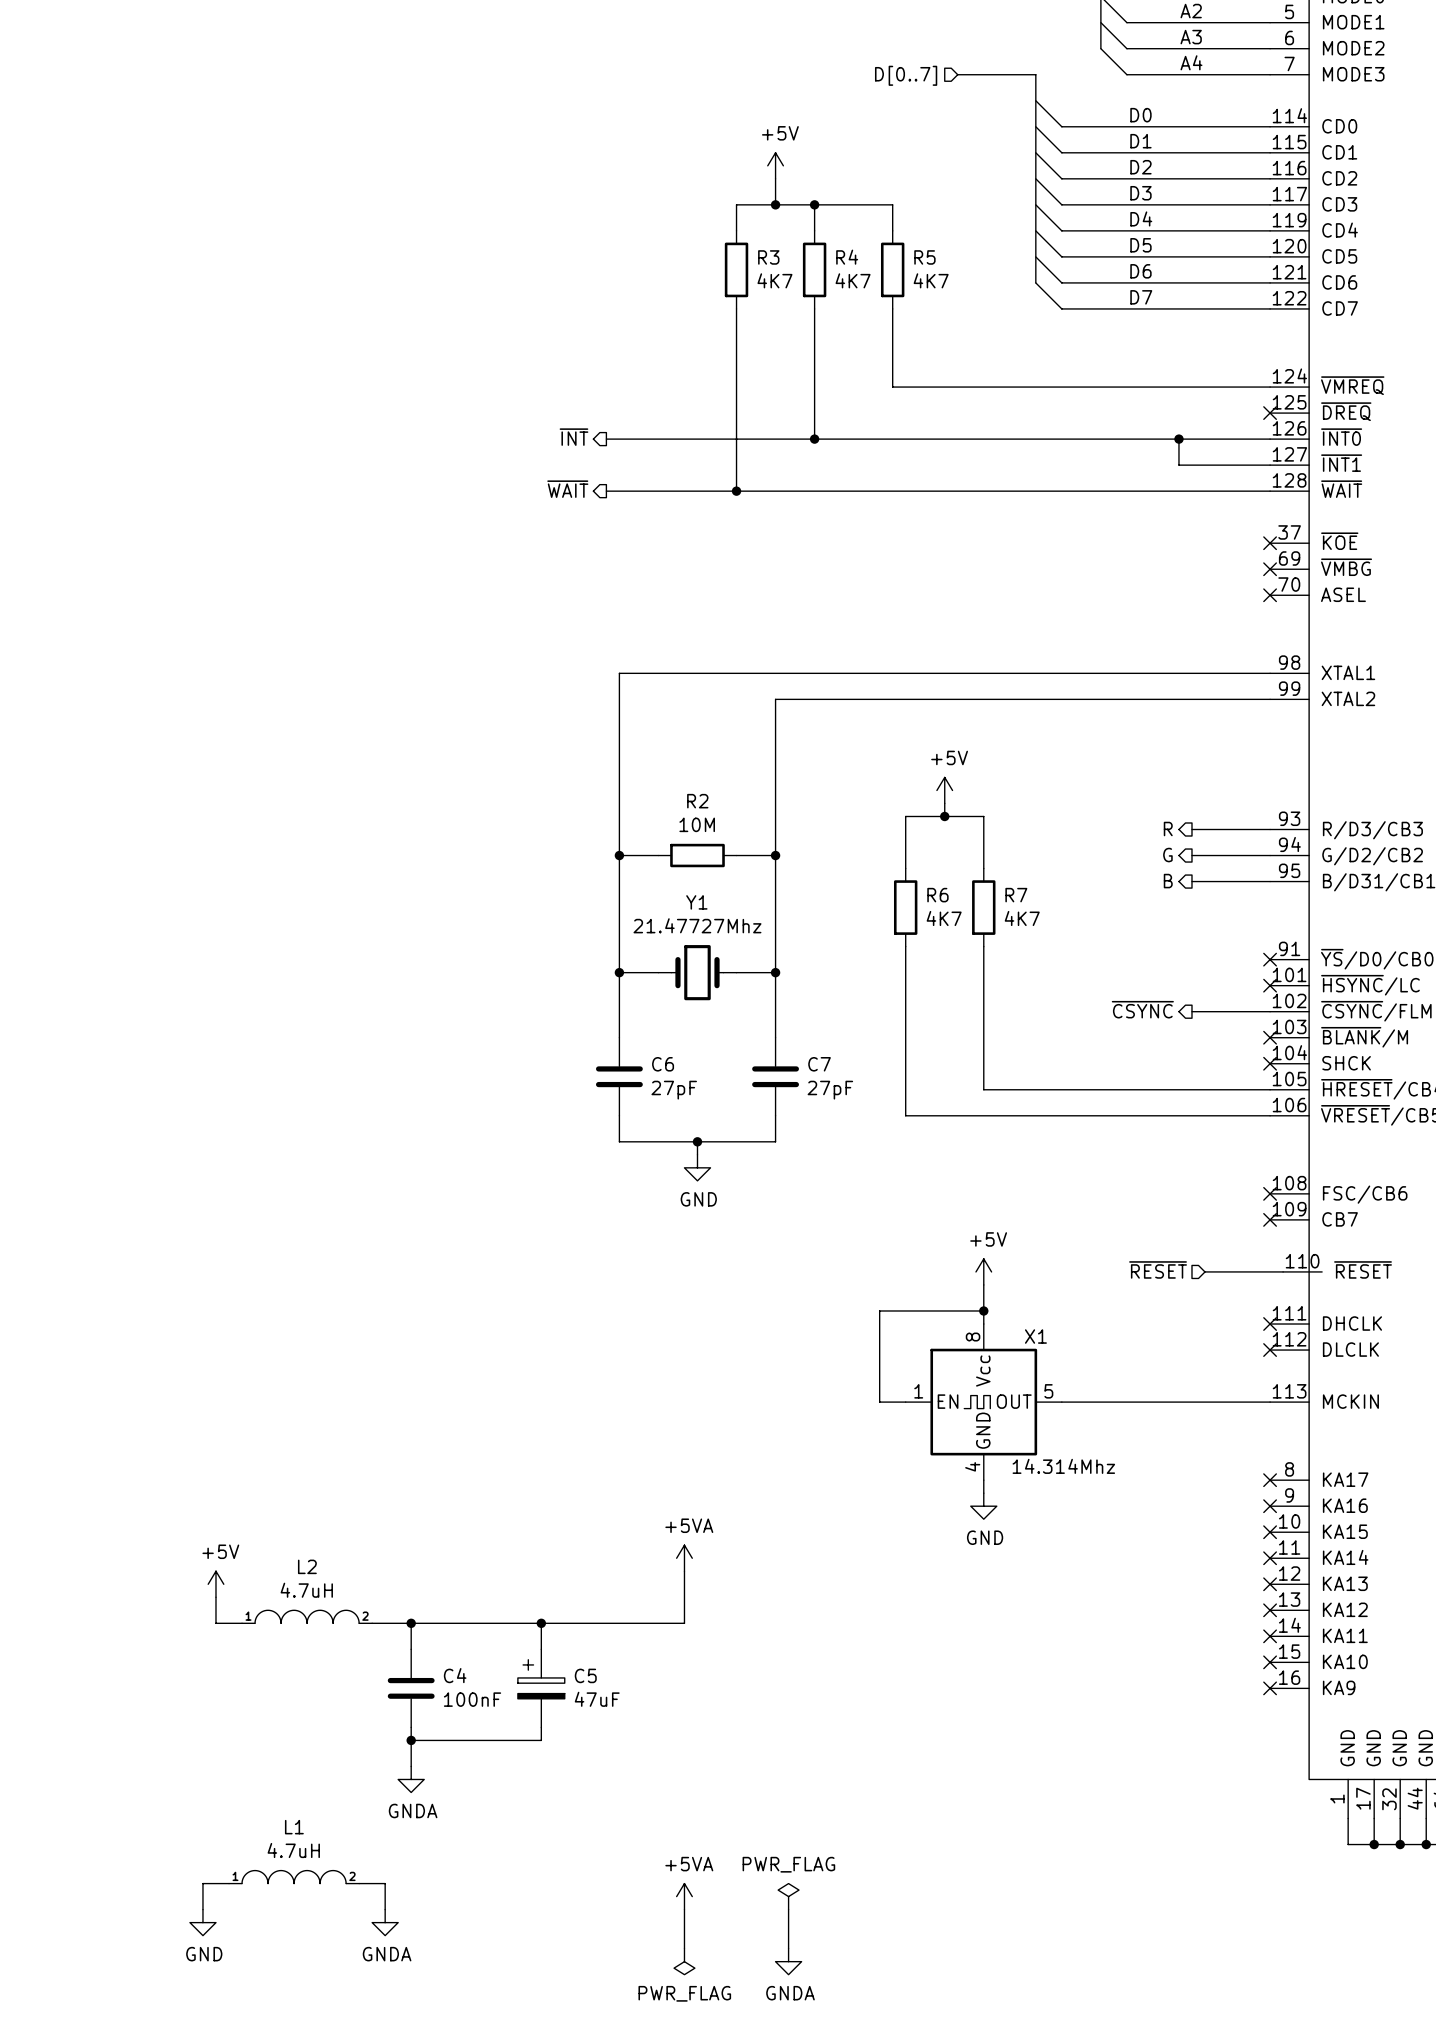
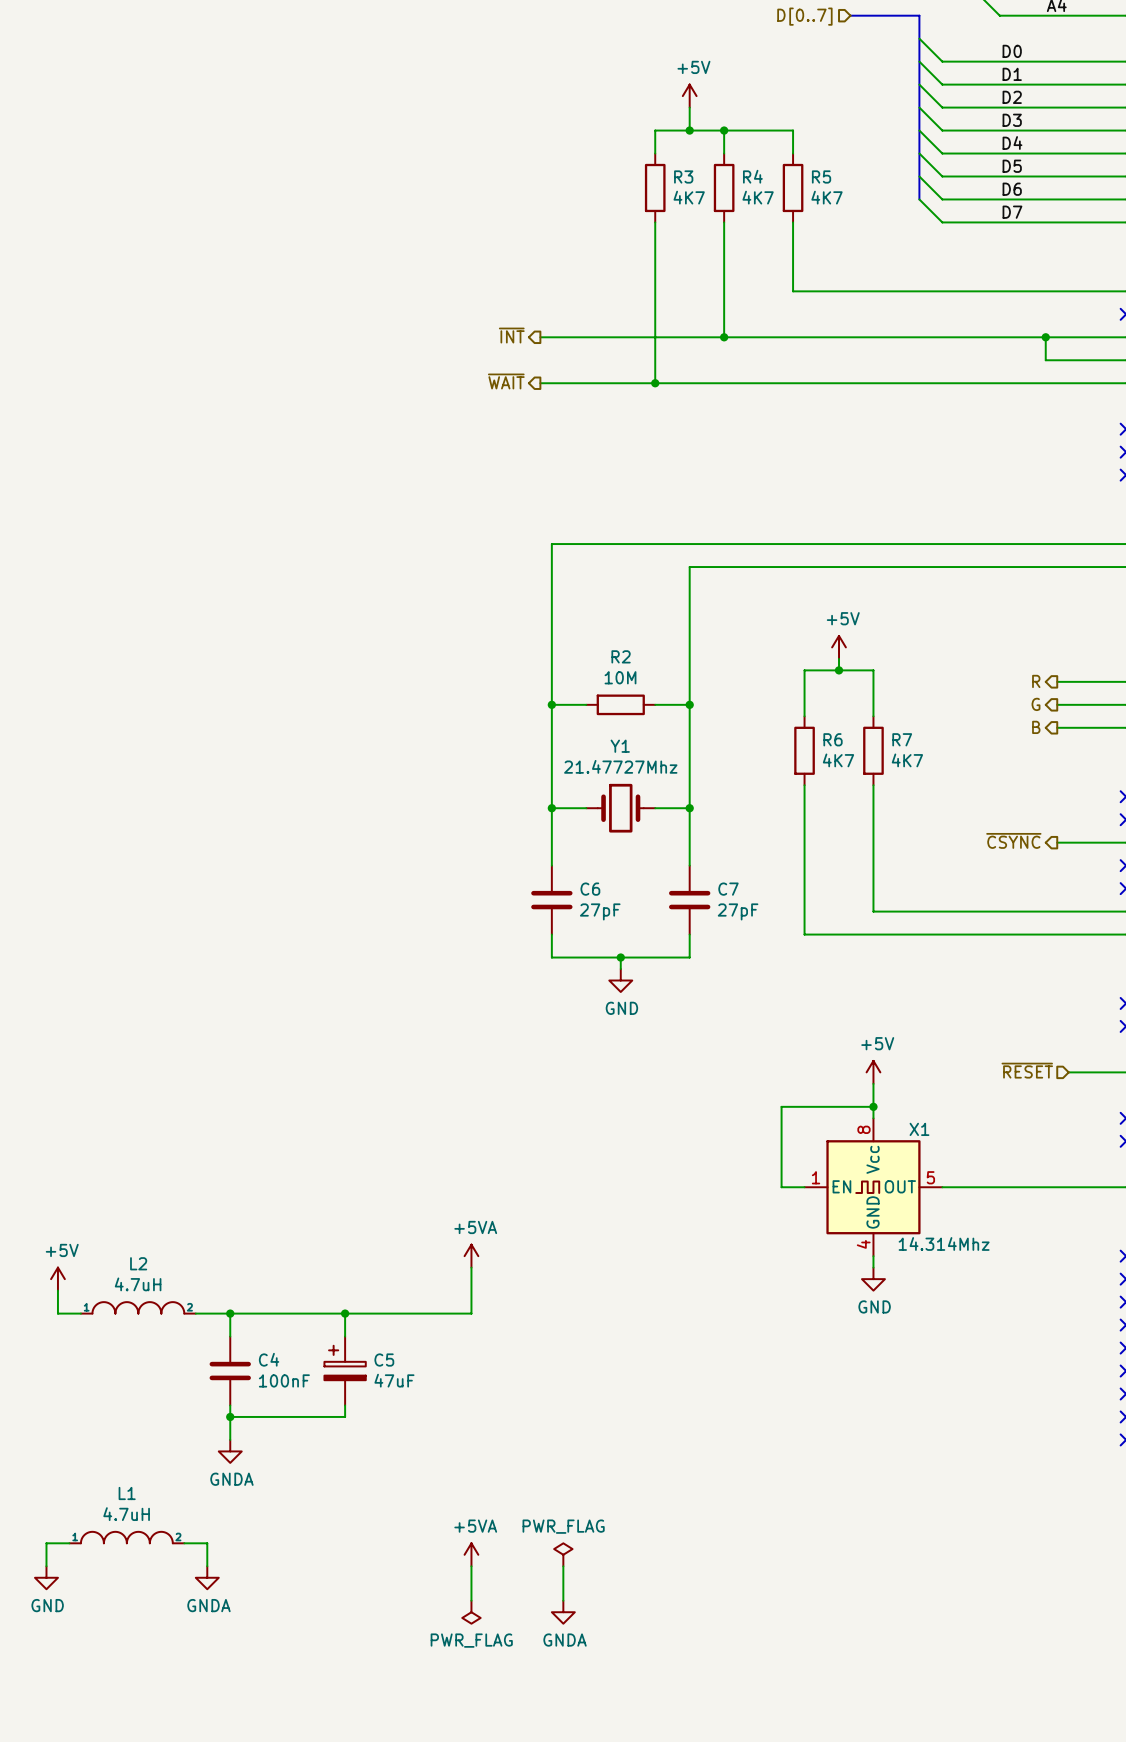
power symbol: none -> +5VA (471, 1256)
junction: none -> (230, 1313)
junction: none -> (345, 1313)
power symbol: +5VA (684, 1558) -> none
wire: (684, 1571) (684, 1623) (372, 1623) -> (471, 1267) (471, 1313) (195, 1313)
power symbol position: +5V (215, 1584) -> +5V (57, 1279)
wire: (215, 1597) (215, 1623) (242, 1623) -> (57, 1290) (57, 1313) (80, 1313)
L2 position: (307, 1616) -> (138, 1307)
wire: (411, 1623) (411, 1649) -> (230, 1313) (230, 1336)
junction: (411, 1623) -> none
wire: (541, 1623) (541, 1649) -> (345, 1313) (345, 1336)
junction: (541, 1623) -> none
junction: none -> (230, 1416)
C4 position: (411, 1688) -> (230, 1371)
C5 position: (541, 1688) -> (345, 1371)
power symbol: none -> GNDA (230, 1451)
wire: (411, 1727) (411, 1766) -> (230, 1405) (230, 1439)
wire: (541, 1727) (541, 1740) (411, 1740) -> (345, 1405) (345, 1416) (230, 1416)
junction: (411, 1740) -> none
power symbol: GNDA (411, 1779) -> none
power symbol: none -> +5VA (471, 1554)
power symbol: none -> PWR_FLAG (563, 1554)
power symbol: none -> GNDA (207, 1577)
L1 position: (294, 1877) -> (126, 1537)
wire: (229, 1883) (202, 1883) (202, 1909) -> (69, 1543) (46, 1543) (46, 1566)
wire: (359, 1883) (385, 1883) (385, 1909) -> (184, 1543) (207, 1543) (207, 1566)
power symbol: none -> PWR_FLAG (471, 1612)
power symbol: none -> GNDA (563, 1612)
power symbol: +5VA (684, 1896) -> none
power symbol: PWR_FLAG (788, 1896) -> none
wire: (684, 1909) (684, 1948) -> (471, 1566) (471, 1600)
wire: (788, 1909) (788, 1948) -> (563, 1566) (563, 1600)
power symbol position: GND (202, 1922) -> GND (46, 1577)
power symbol: GNDA (385, 1922) -> none
power symbol: PWR_FLAG (684, 1961) -> none
power symbol: GNDA (788, 1961) -> none

